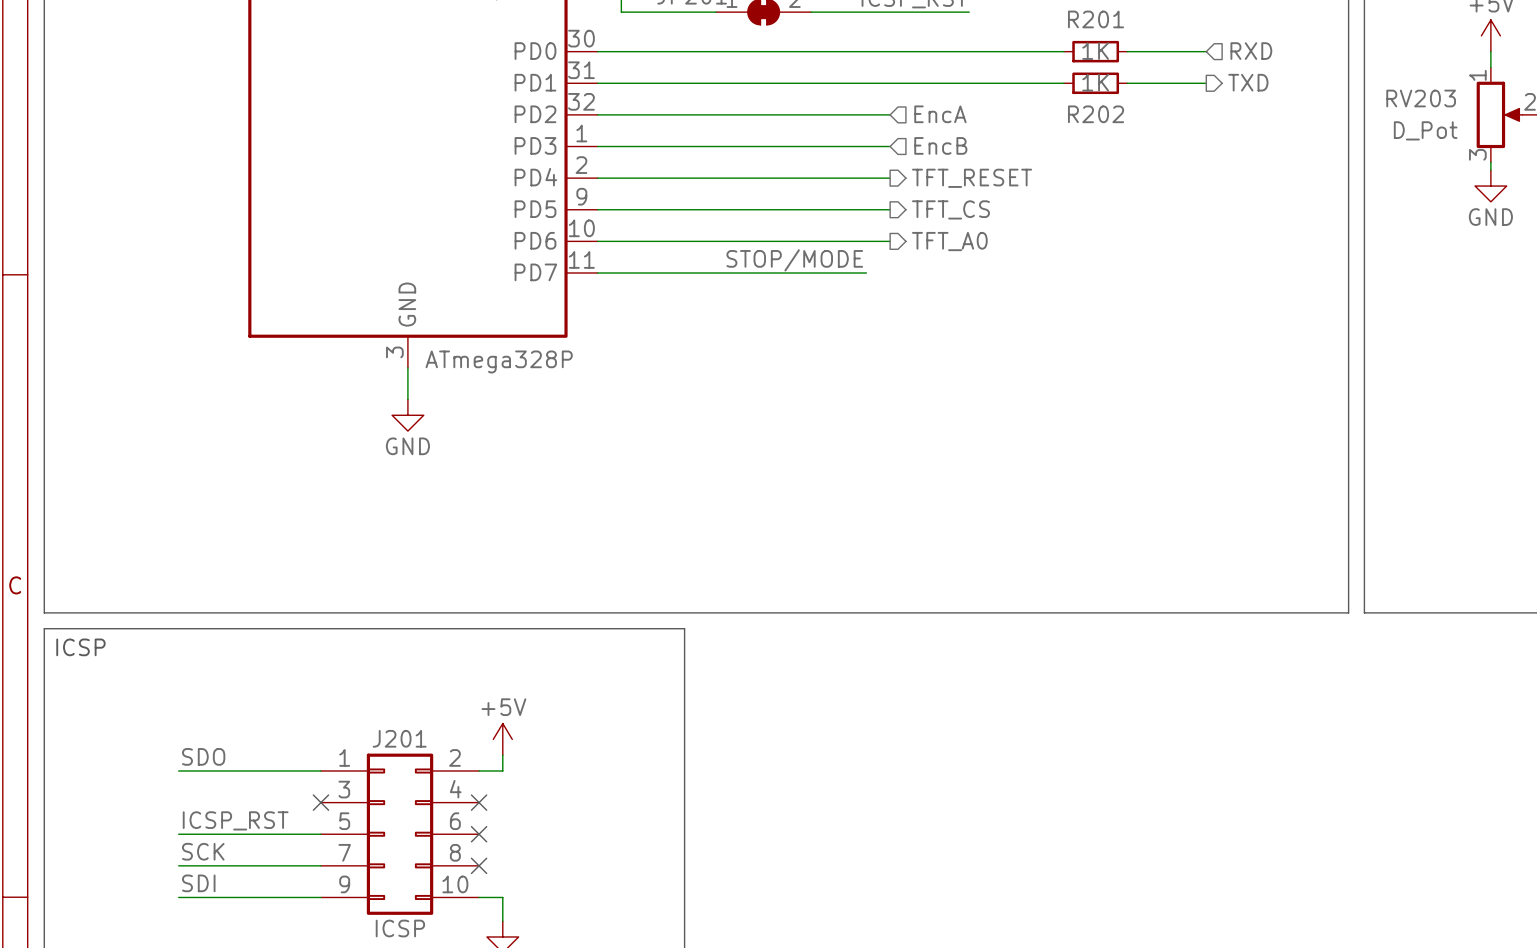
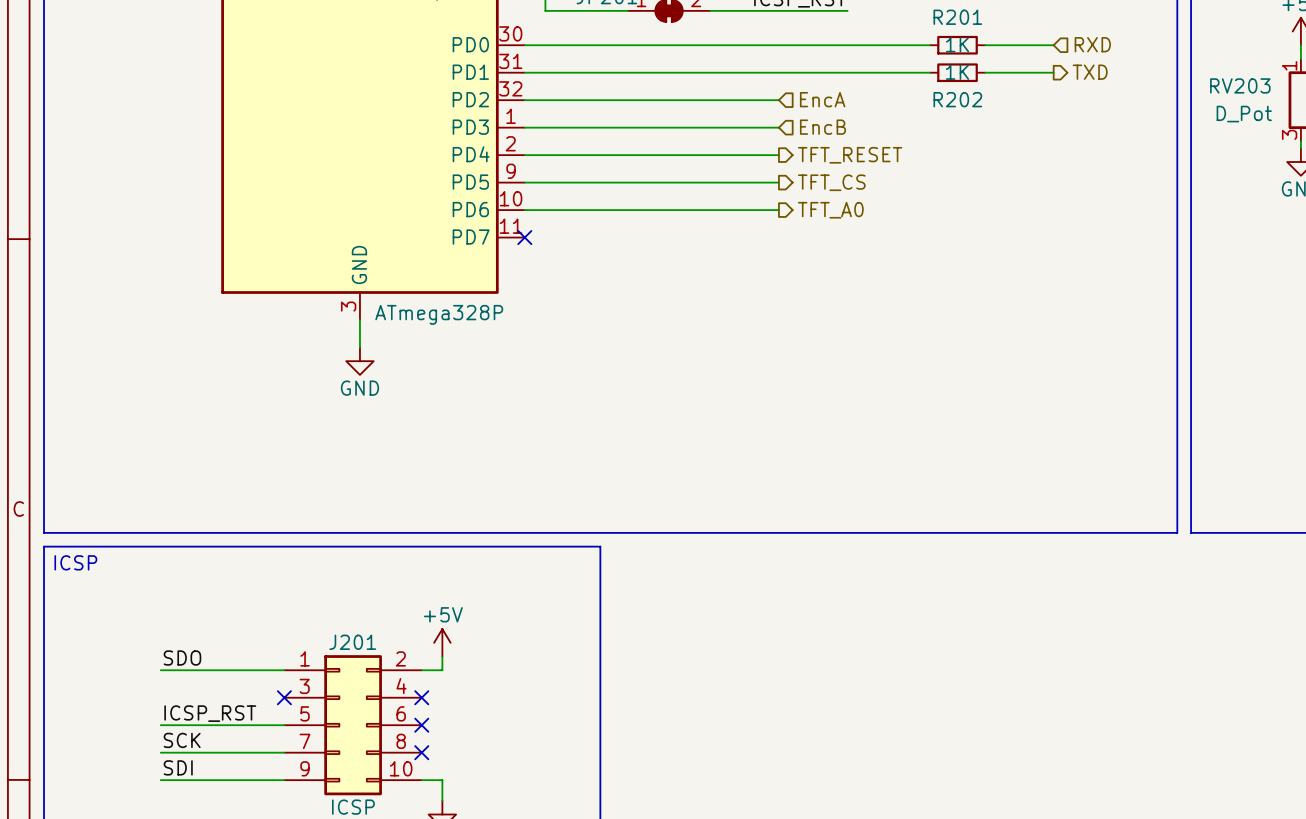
label: STOP/MODE (794, 260) -> none
wire: (597, 272) (866, 272) -> none
no-connect mark: none -> (524, 237)

